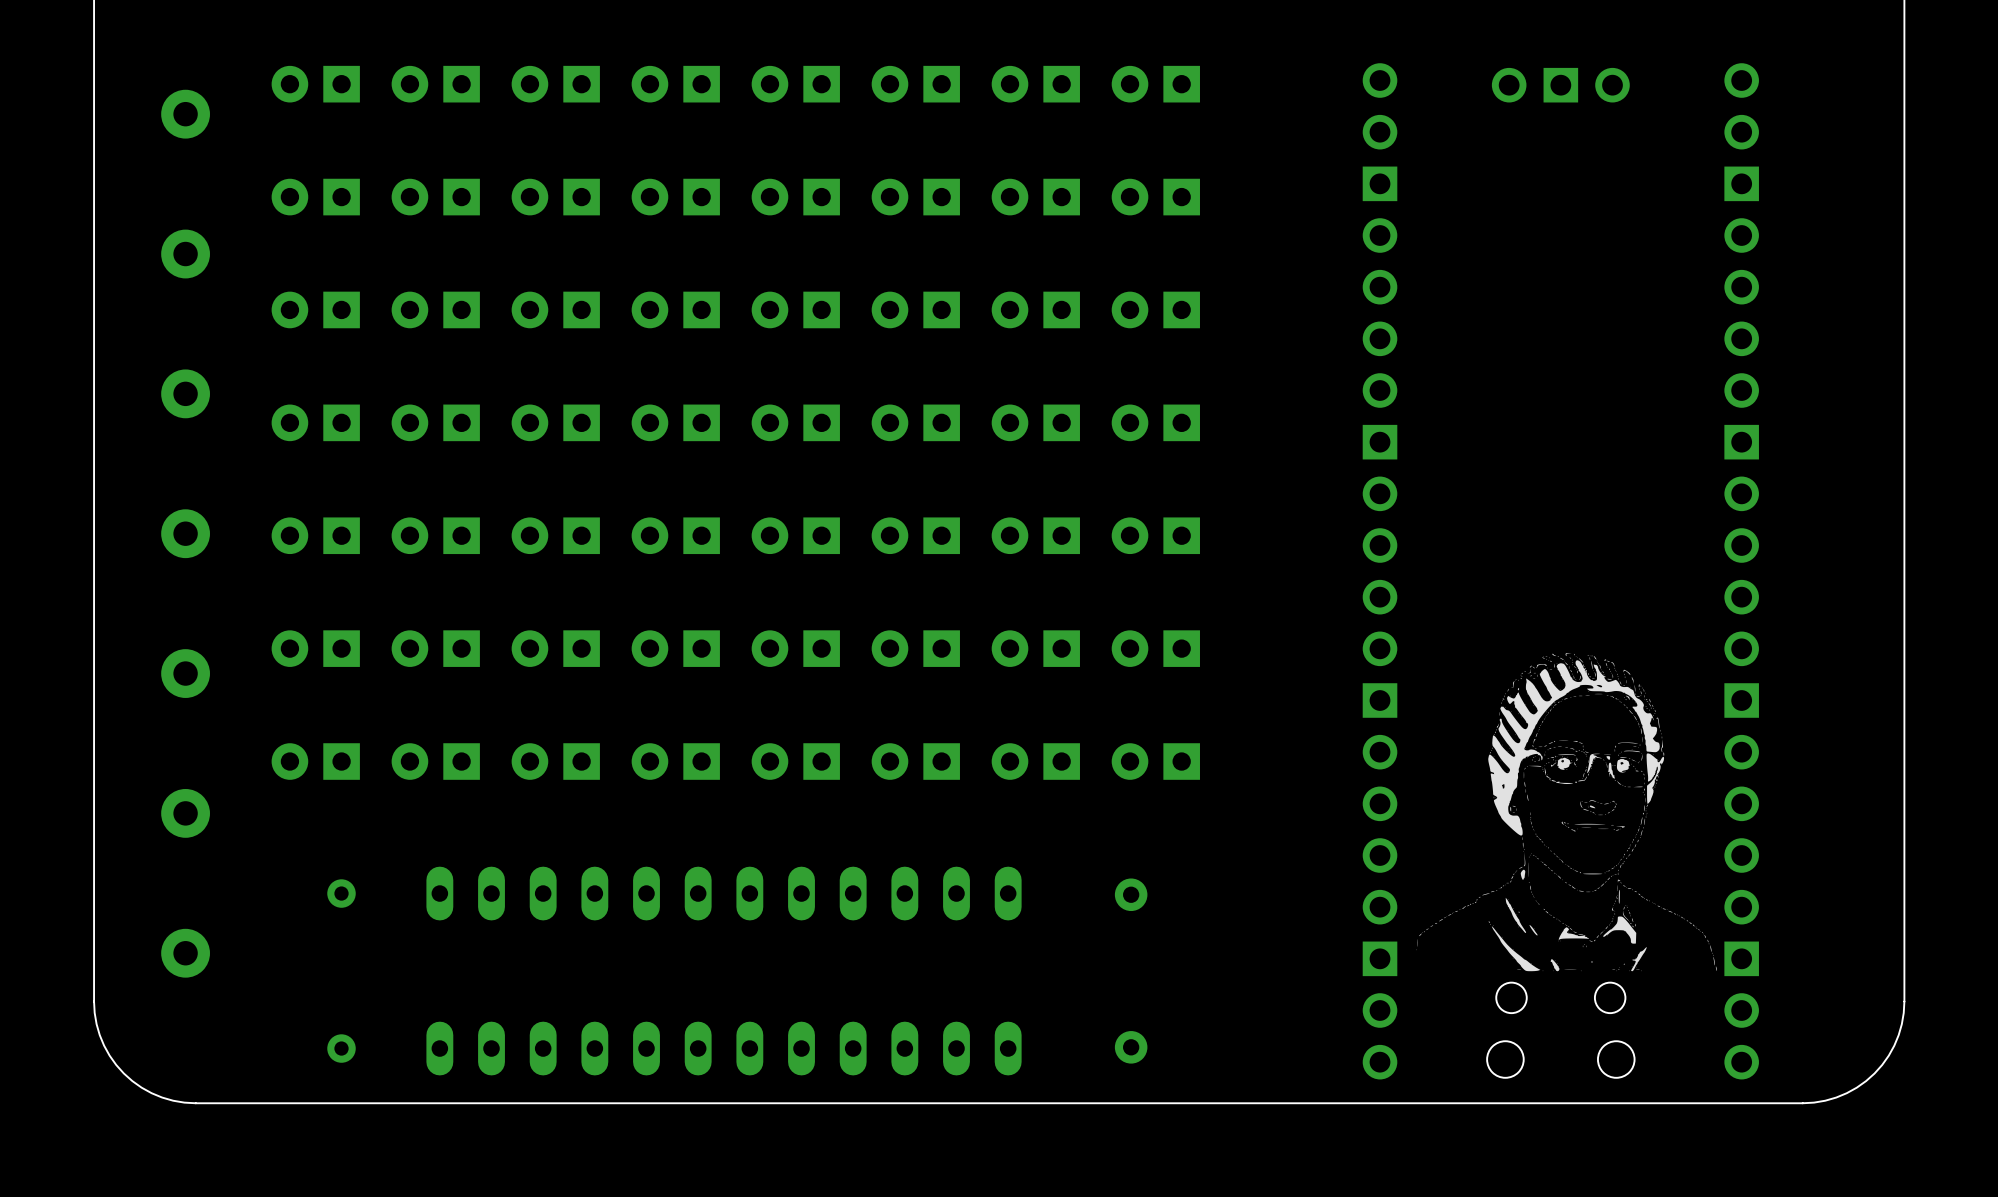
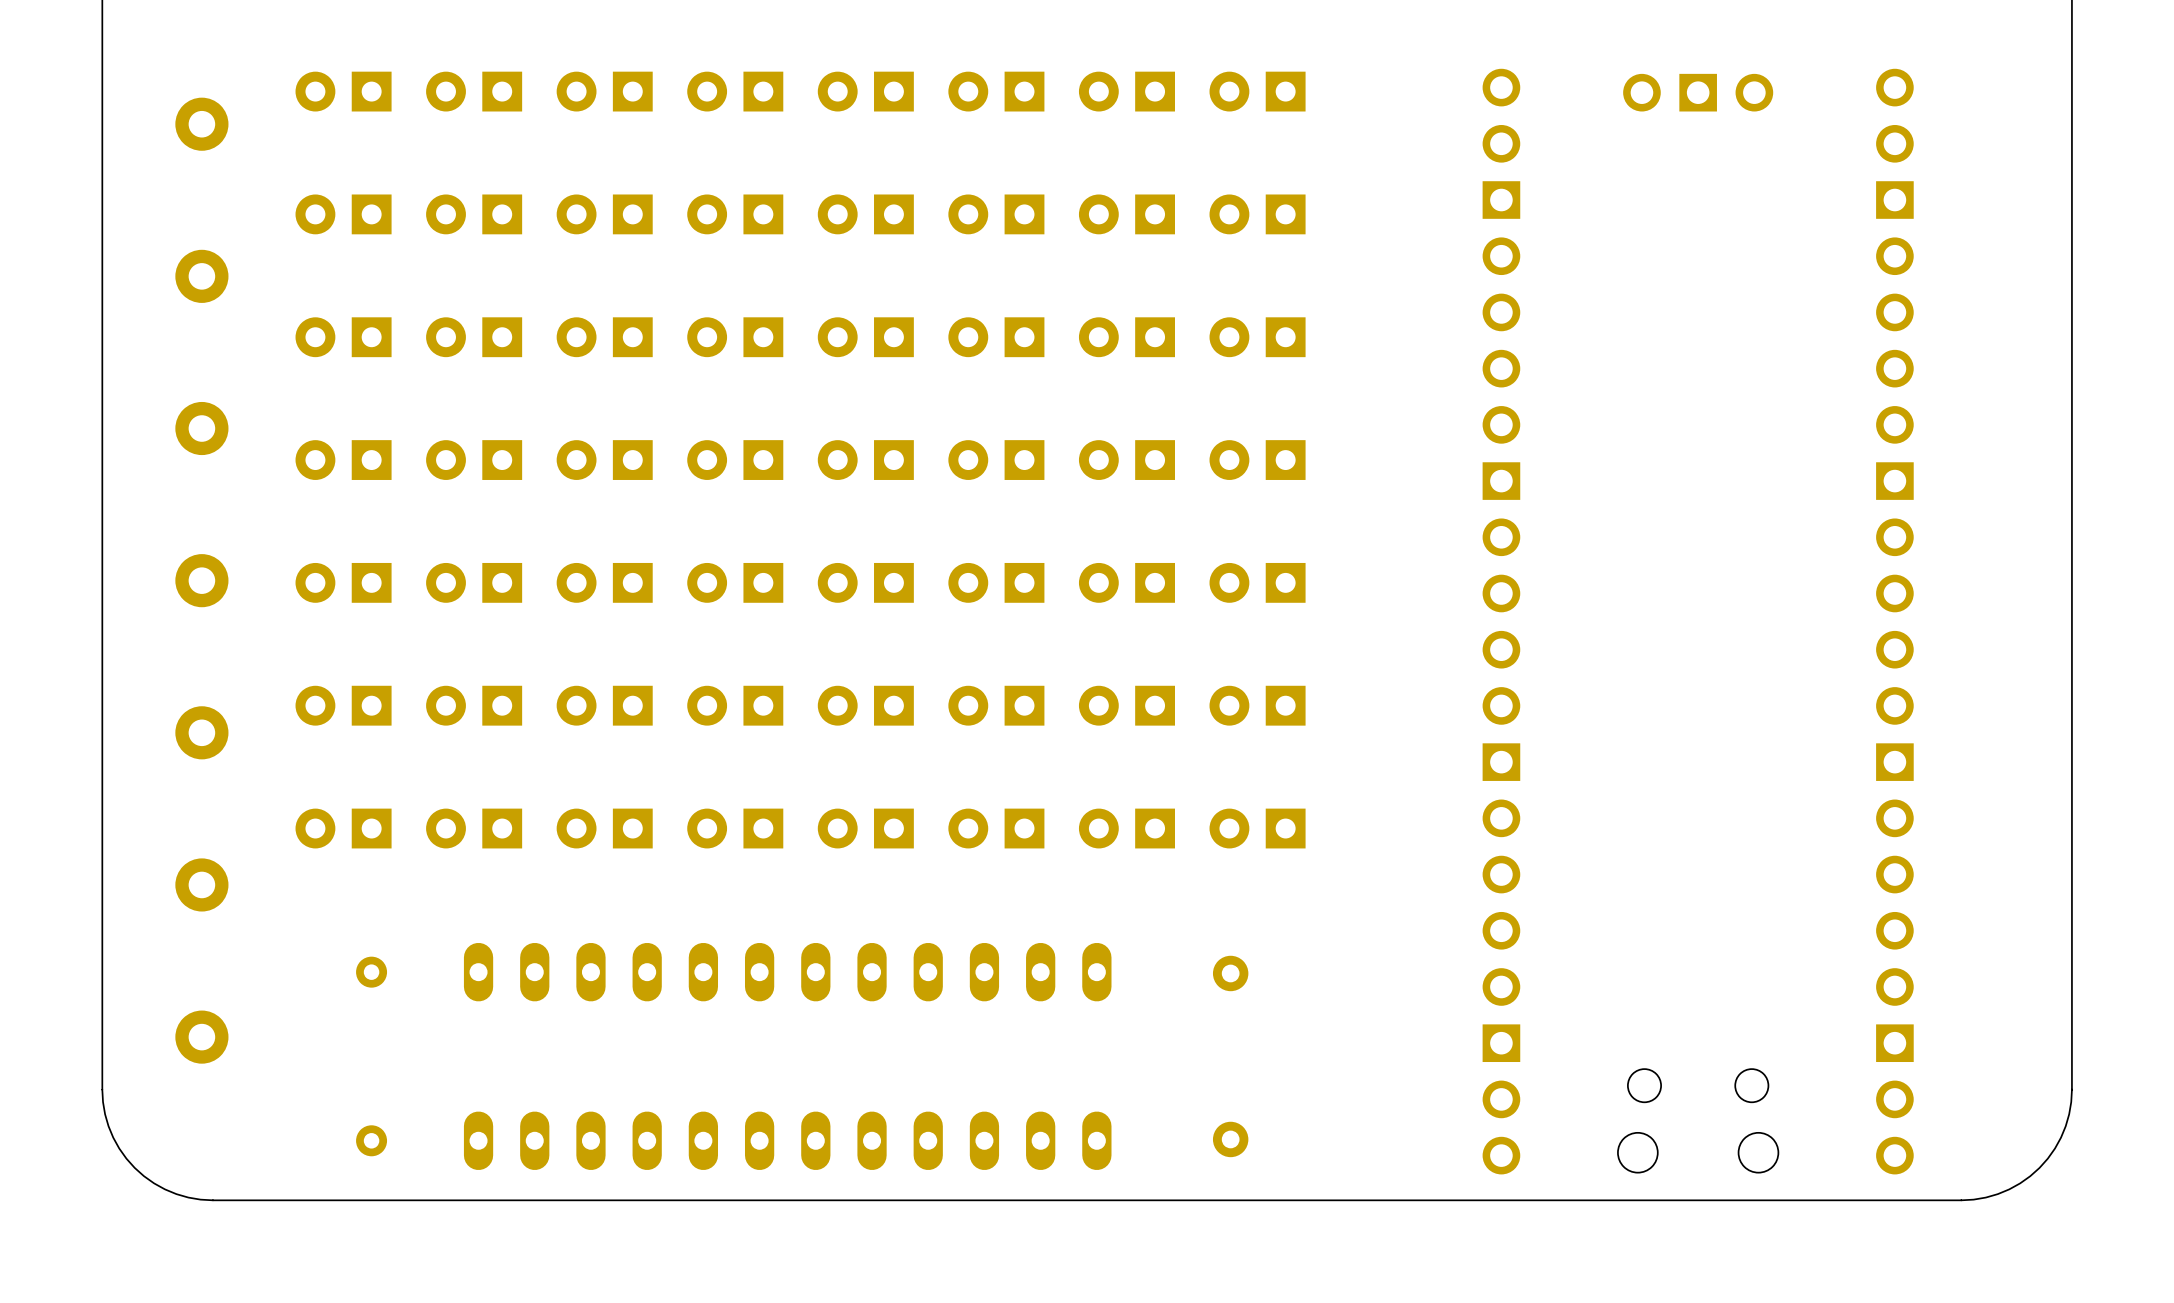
drawing: [1416, 653, 1717, 972] -> none

